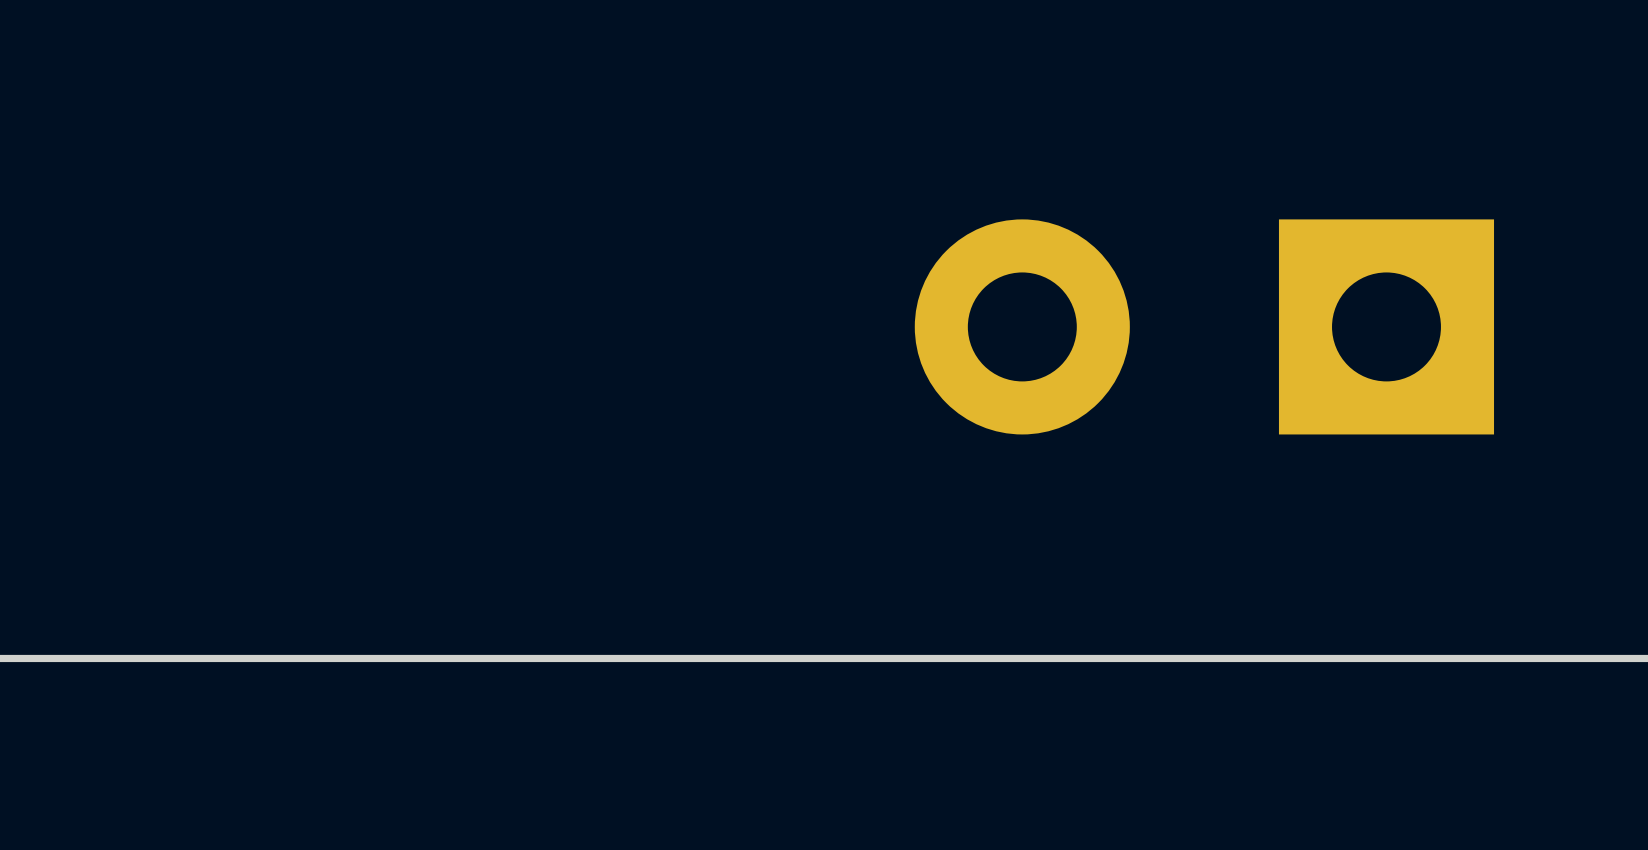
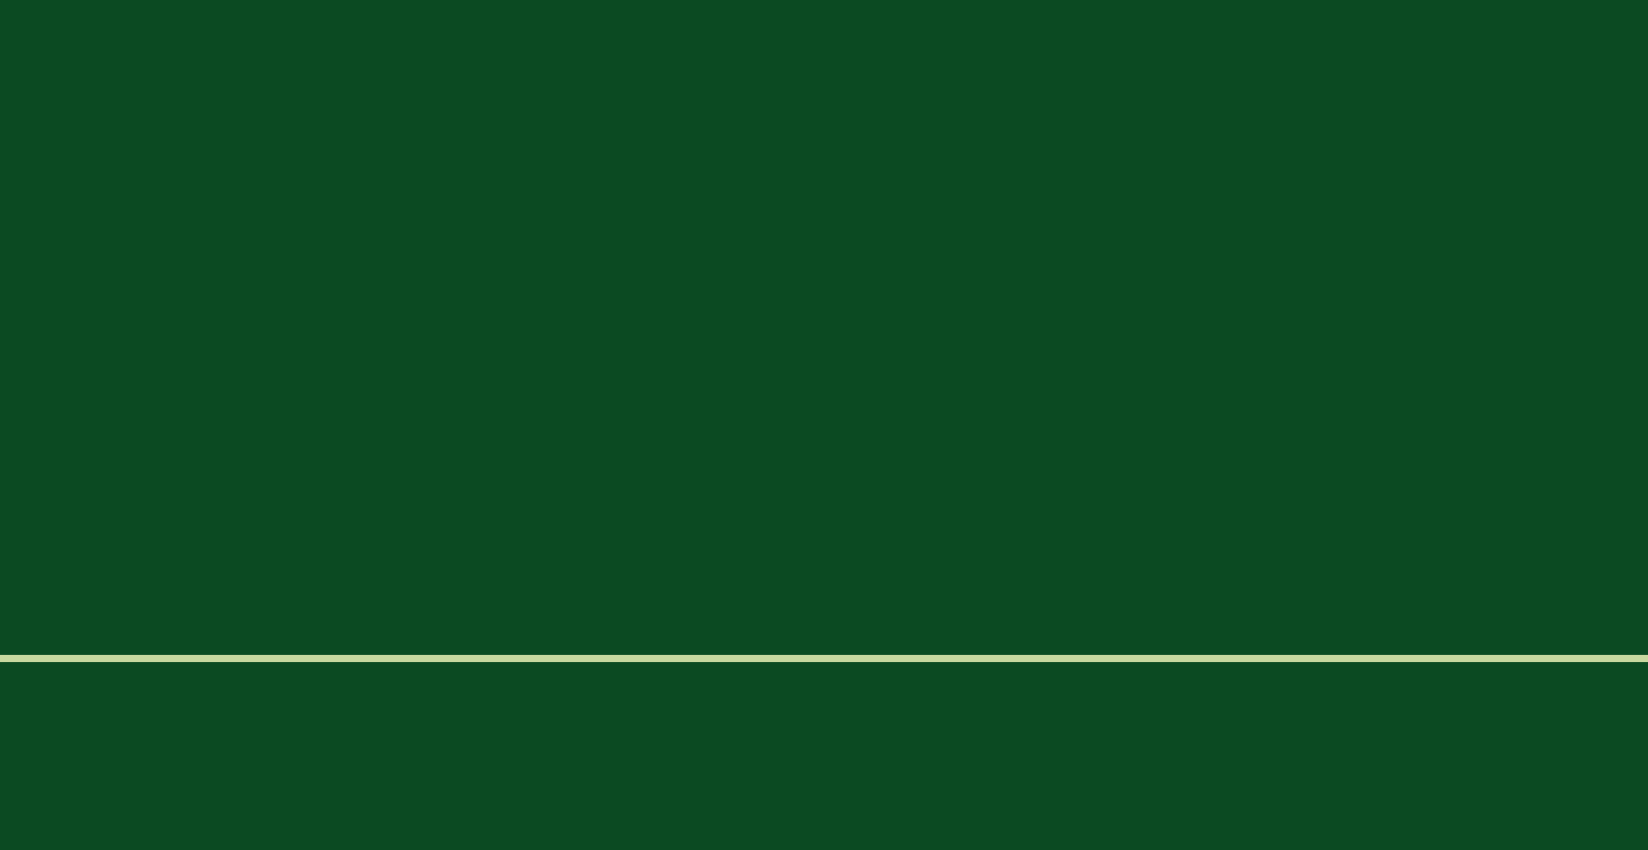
part: (1204, 326) -> none

